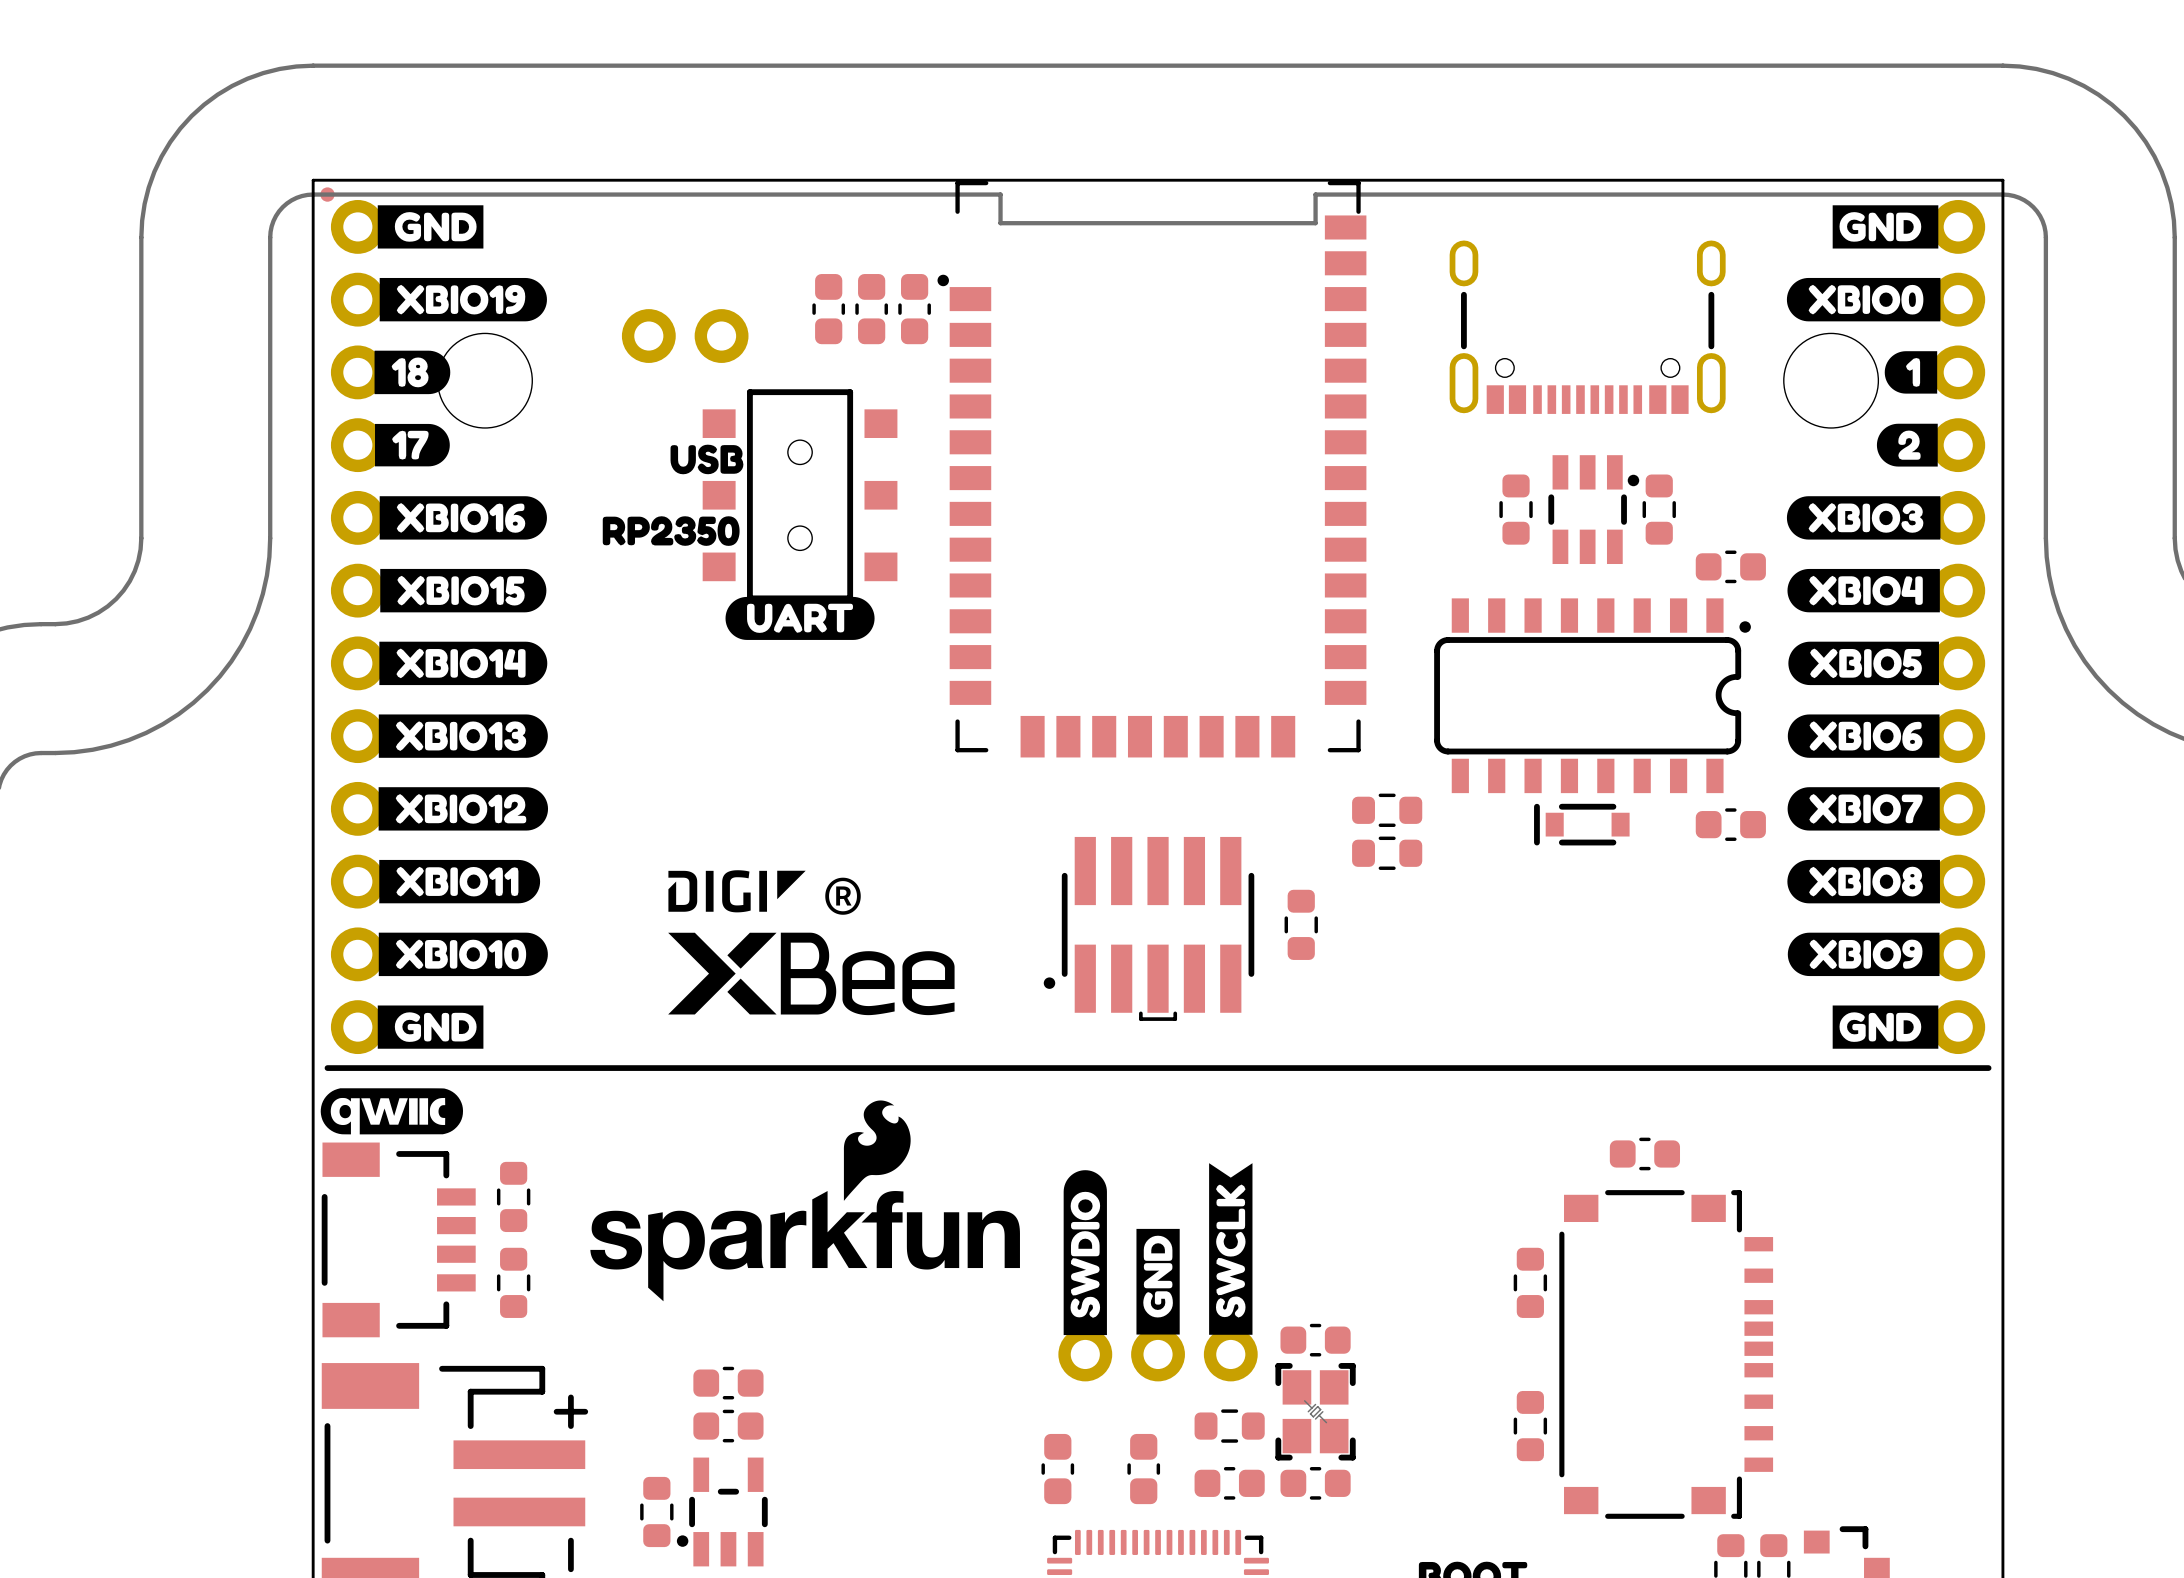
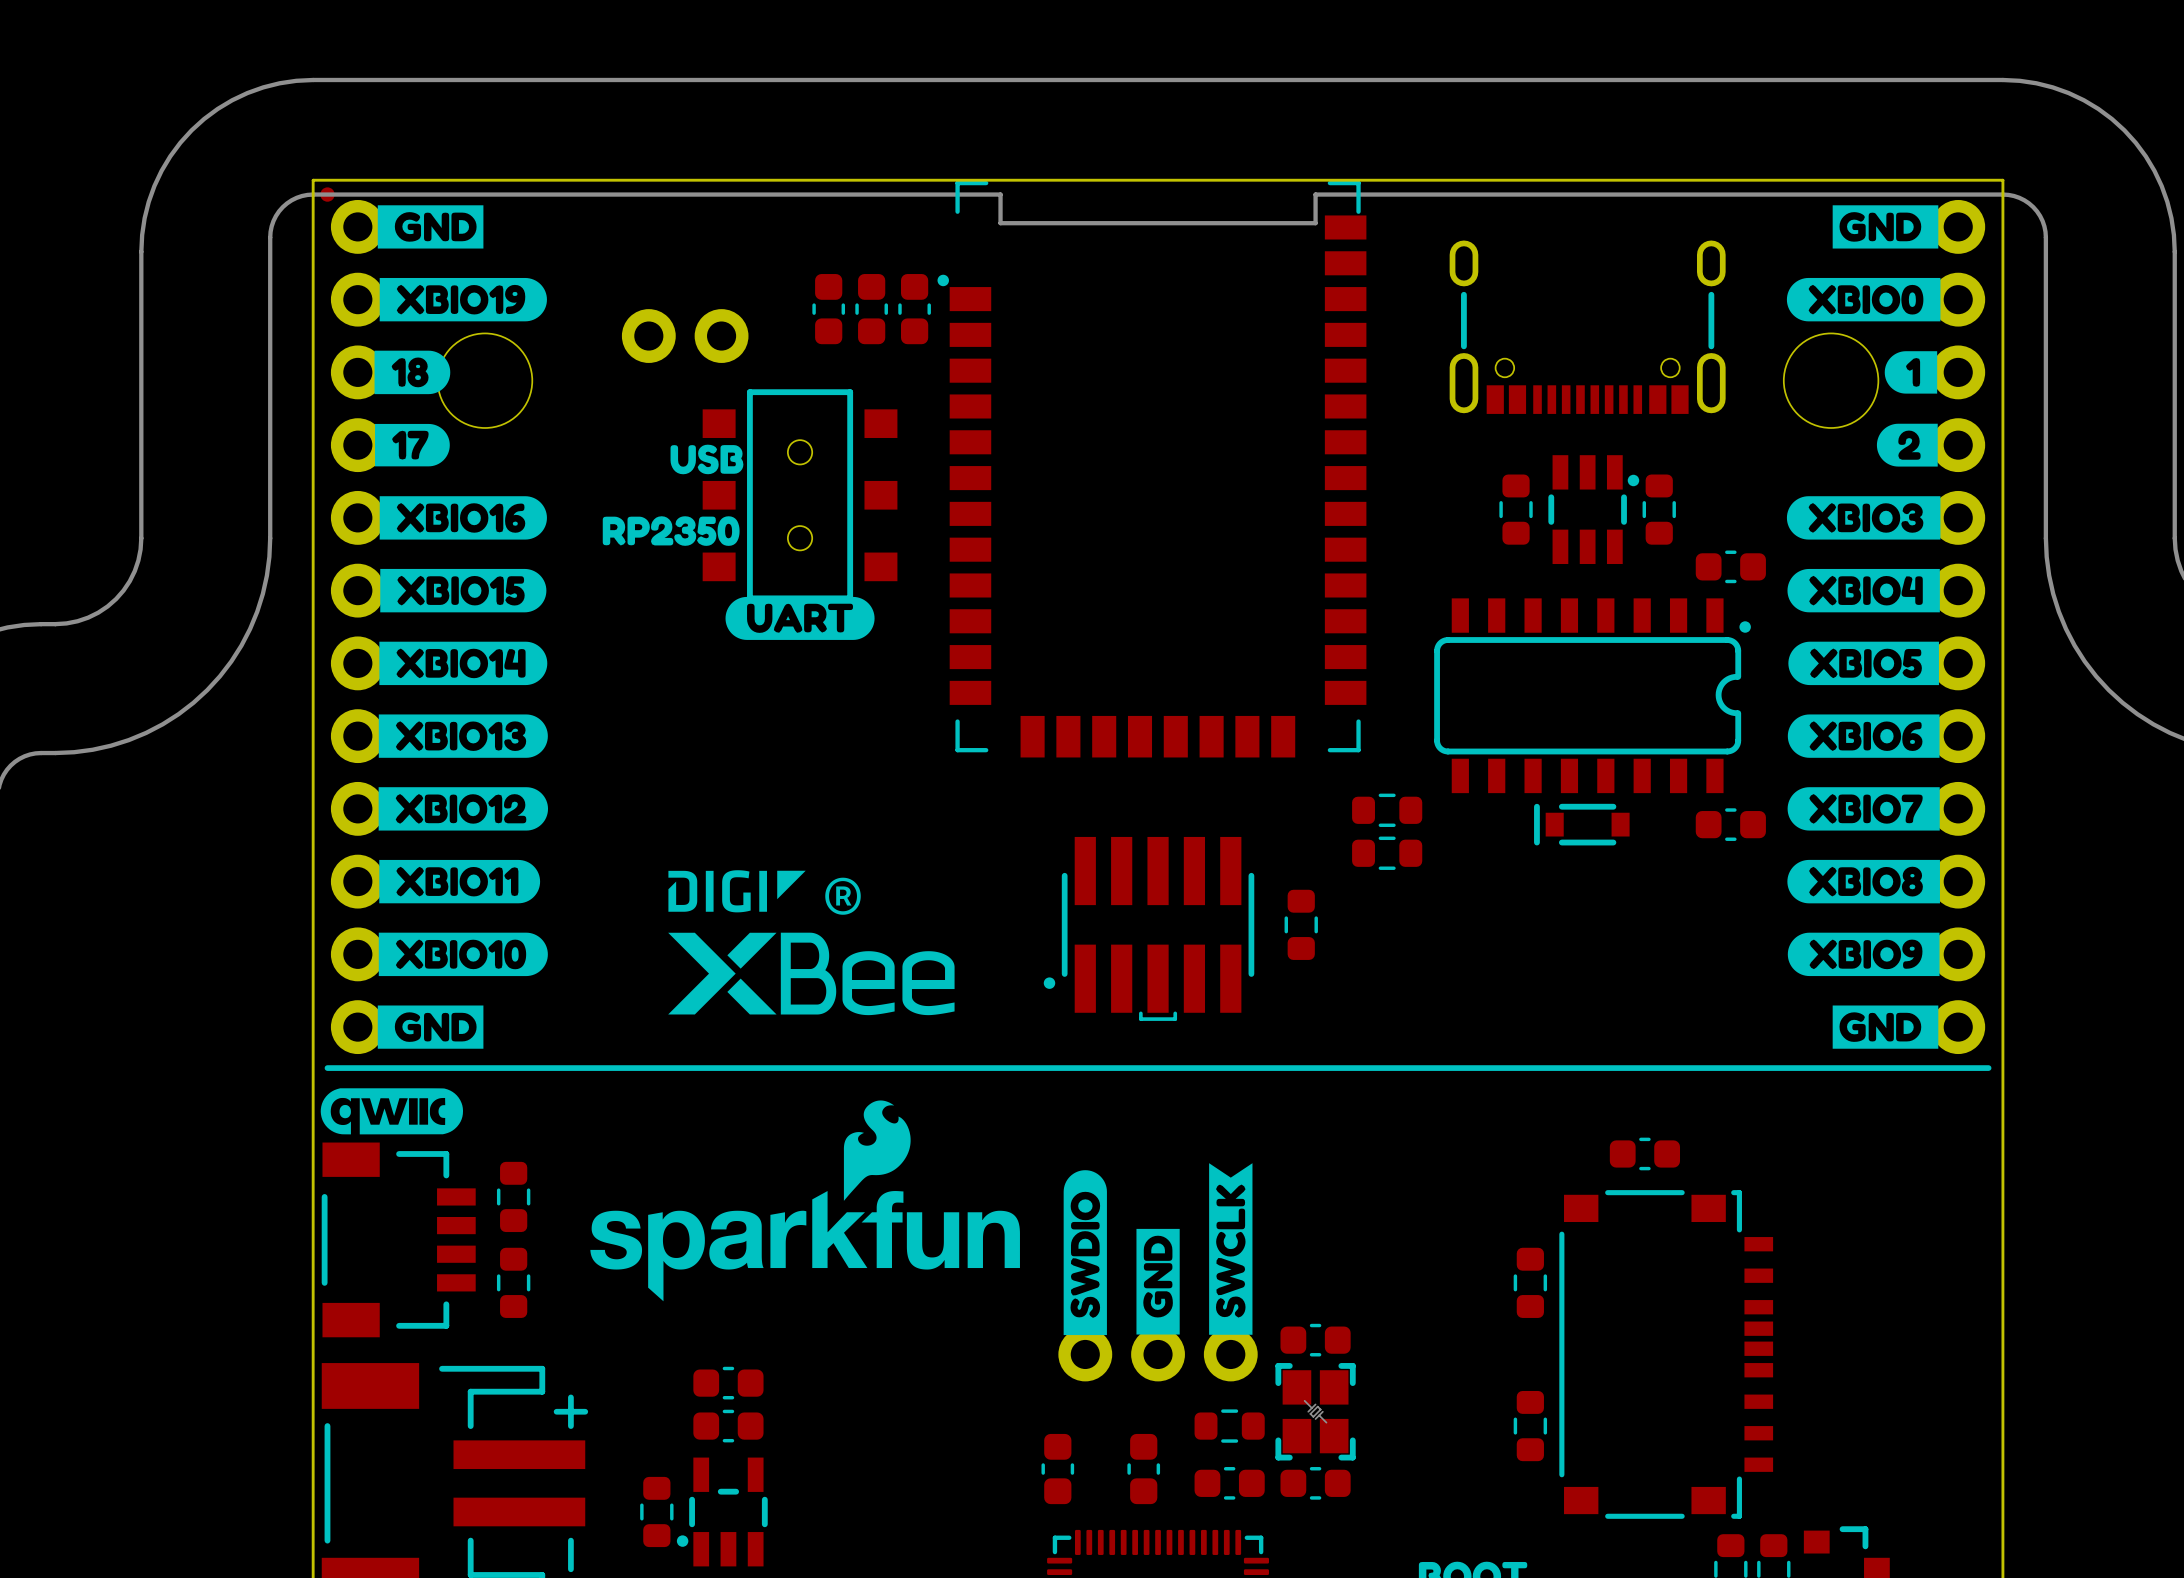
line: (141, 251) (144, 203) (154, 171) (170, 142) (191, 116) (217, 94) (247, 78) (279, 68) (313, 65) (2019, 66) (2052, 73) (2083, 85) (2111, 104) (2135, 128) (2154, 156) (2167, 187) (2173, 220) (2174, 251) -> (141, 251) (144, 218) (154, 186) (170, 156) (191, 130) (217, 108) (232, 100) (263, 87) (296, 80) (2002, 79) (2036, 83) (2068, 93) (2098, 108) (2124, 130) (2145, 156) (2161, 186) (2171, 218) (2174, 251)

